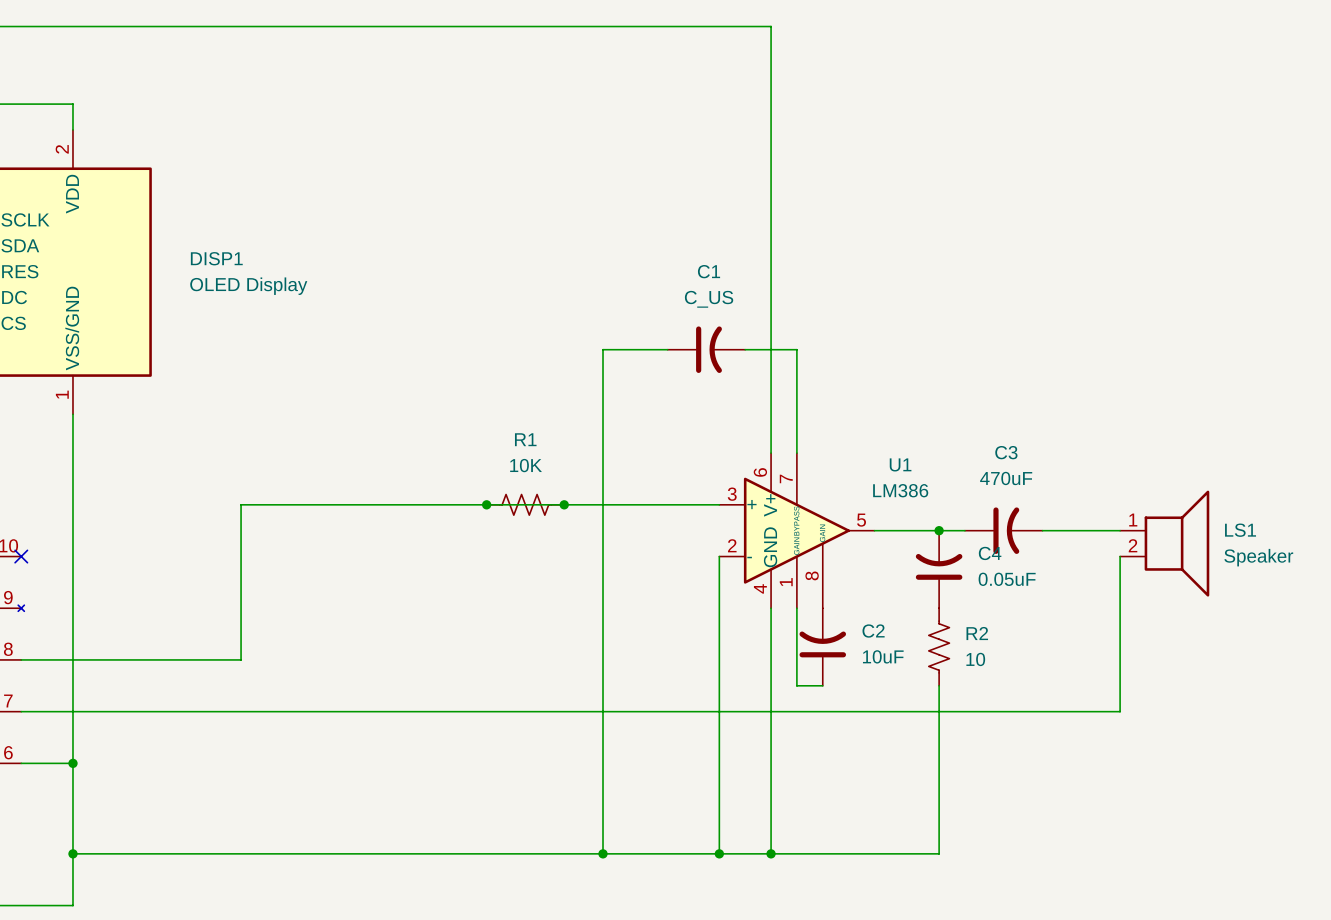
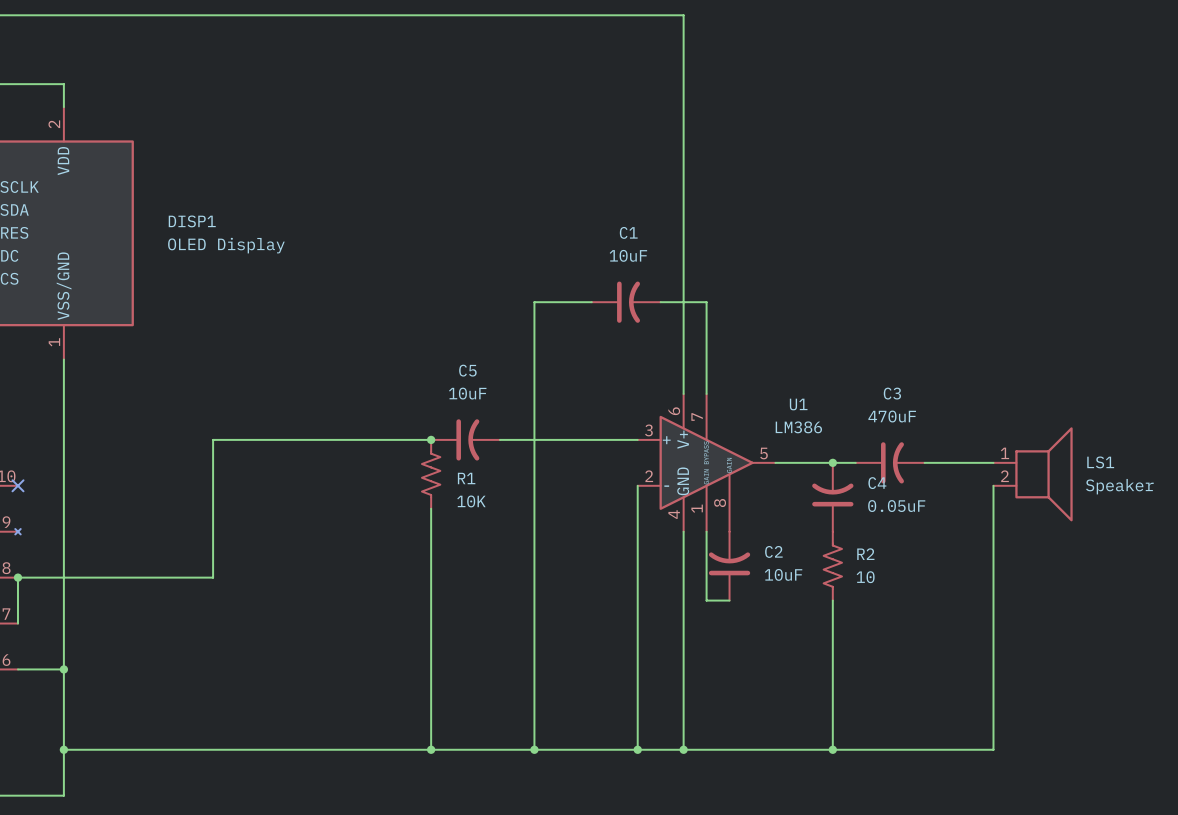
C1 value: C_US (709, 299) -> 10uF (628, 255)
R1 name position: R1 (525, 439) -> R1 (466, 478)
R1 value position: 10K (526, 465) -> 10K (471, 501)
R1 rotation: 0° (525, 504) -> 90° clockwise (431, 474)
R1 position: (525, 504) -> (431, 474)
C5: none -> 10uF (465, 439)
junction: (564, 504) -> none
wire: none -> (431, 508) (431, 749)
wire: none -> (17, 577) (17, 623)
junction: none -> (17, 577)
wire: (21, 711) (1120, 711) -> (832, 749) (993, 749) (993, 623)
junction: none -> (431, 749)
junction: none -> (832, 749)

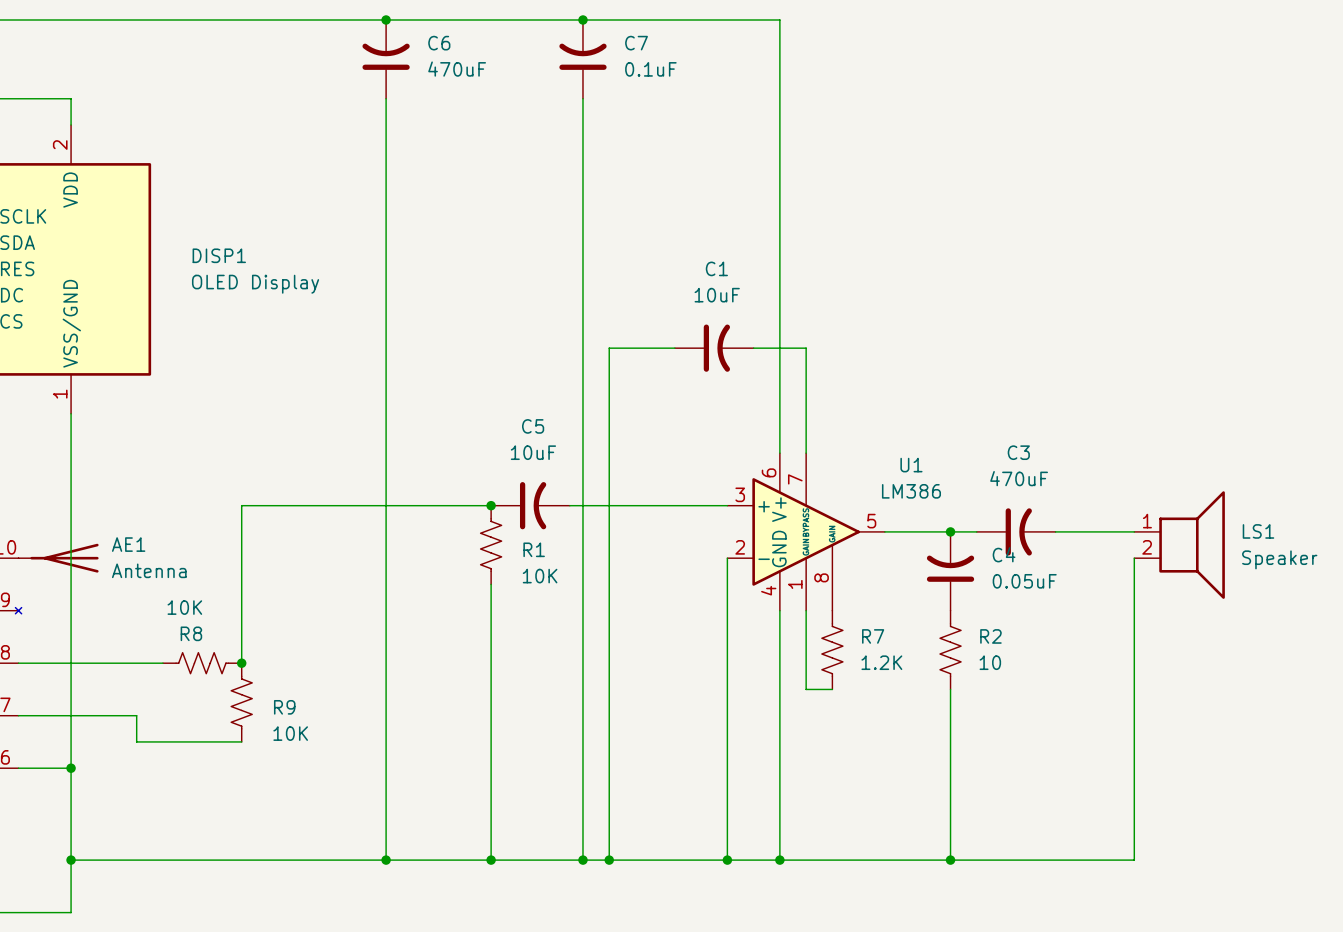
junction: none -> (386, 19)
junction: none -> (582, 19)
C6: none -> 470uF (386, 59)
C7: none -> 0.1uF (582, 59)
wire: none -> (386, 98) (386, 860)
wire: none -> (582, 98) (582, 860)
no-connect mark: (17, 485) -> none
AE1: none -> Antenna (58, 558)
C2: 10uF (729, 566) -> none
R7: none -> 1.2K (832, 650)
wire: (17, 577) (17, 623) -> (241, 741) (136, 741) (136, 715) (18, 715)
junction: (17, 577) -> none
R8: none -> 10K (202, 663)
junction: none -> (241, 663)
R9: none -> 10K (241, 702)
junction: none -> (386, 860)
junction: none -> (582, 860)

